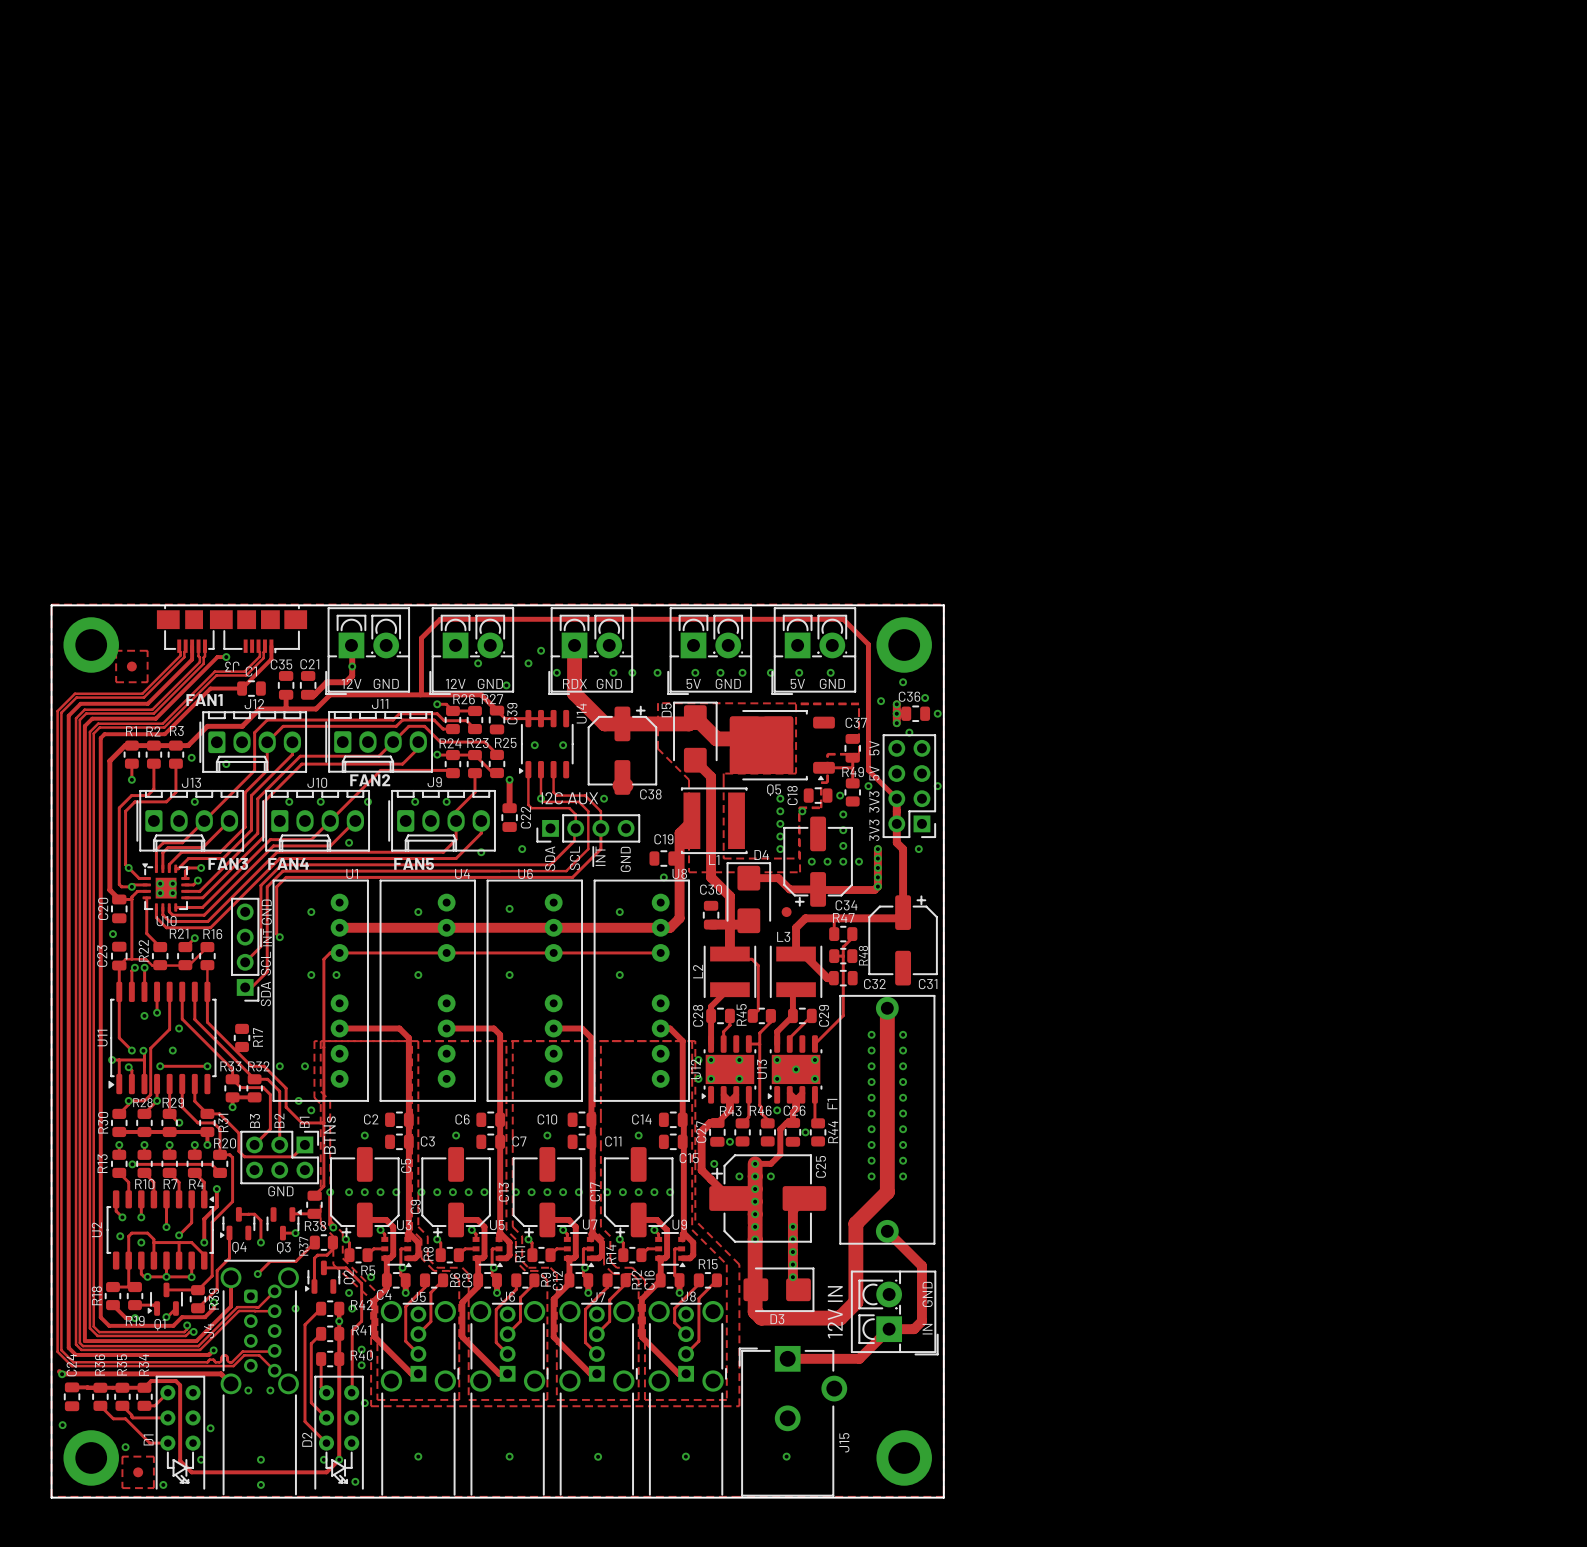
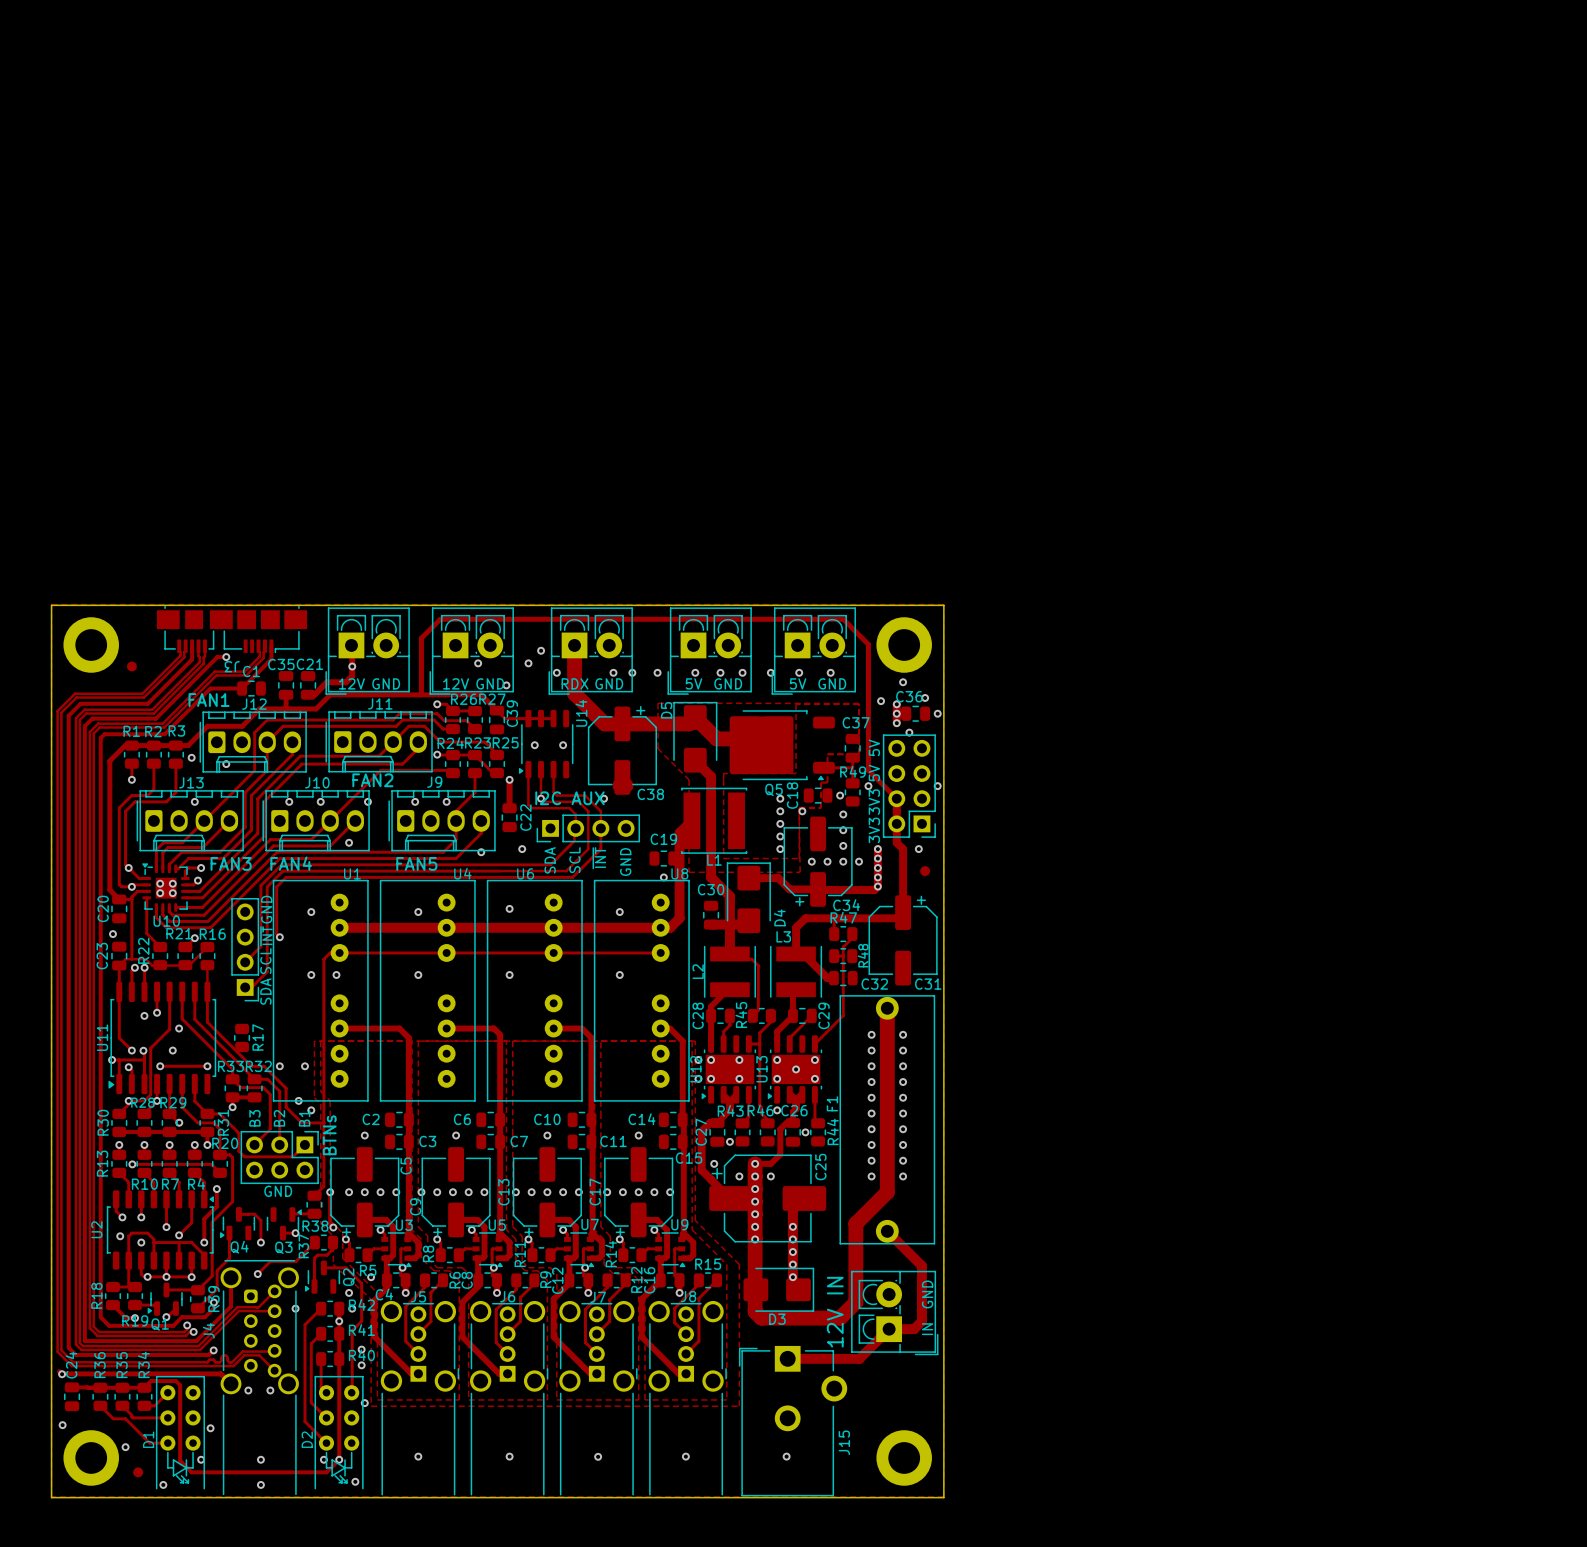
zone outline: (116, 650) (147, 650) (147, 682) (116, 682) (116, 650) -> none
D4 name rotation: 0° (761, 855) -> 90° counterclockwise (779, 917)
D4 name position: D4 (761, 855) -> D4 (779, 917)
part position: (786, 912) -> (925, 871)
zone outline: (122, 1456) (122, 1488) (153, 1488) (153, 1456) (122, 1456) -> none

